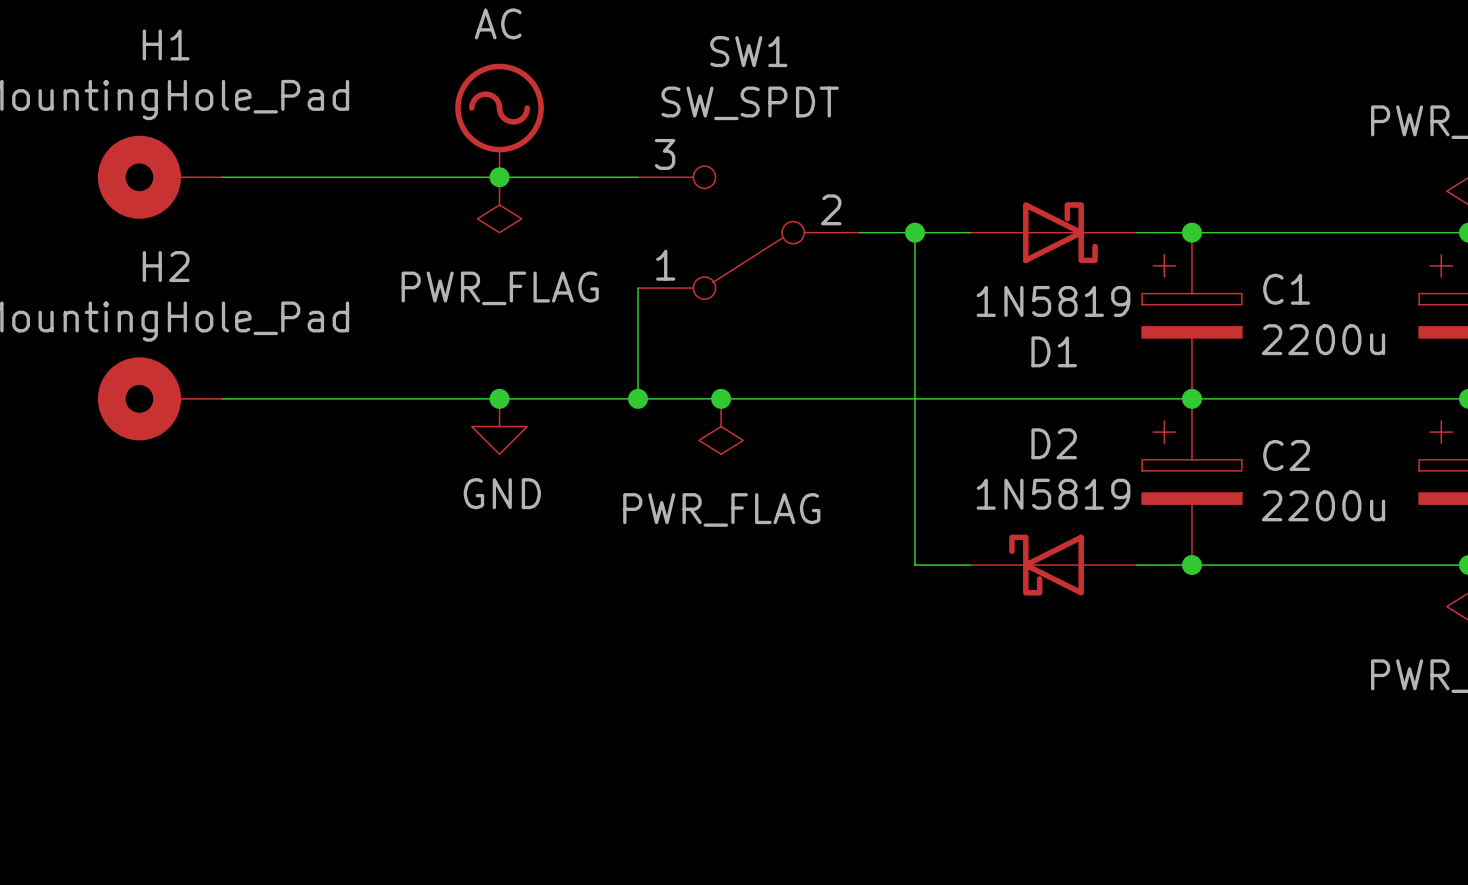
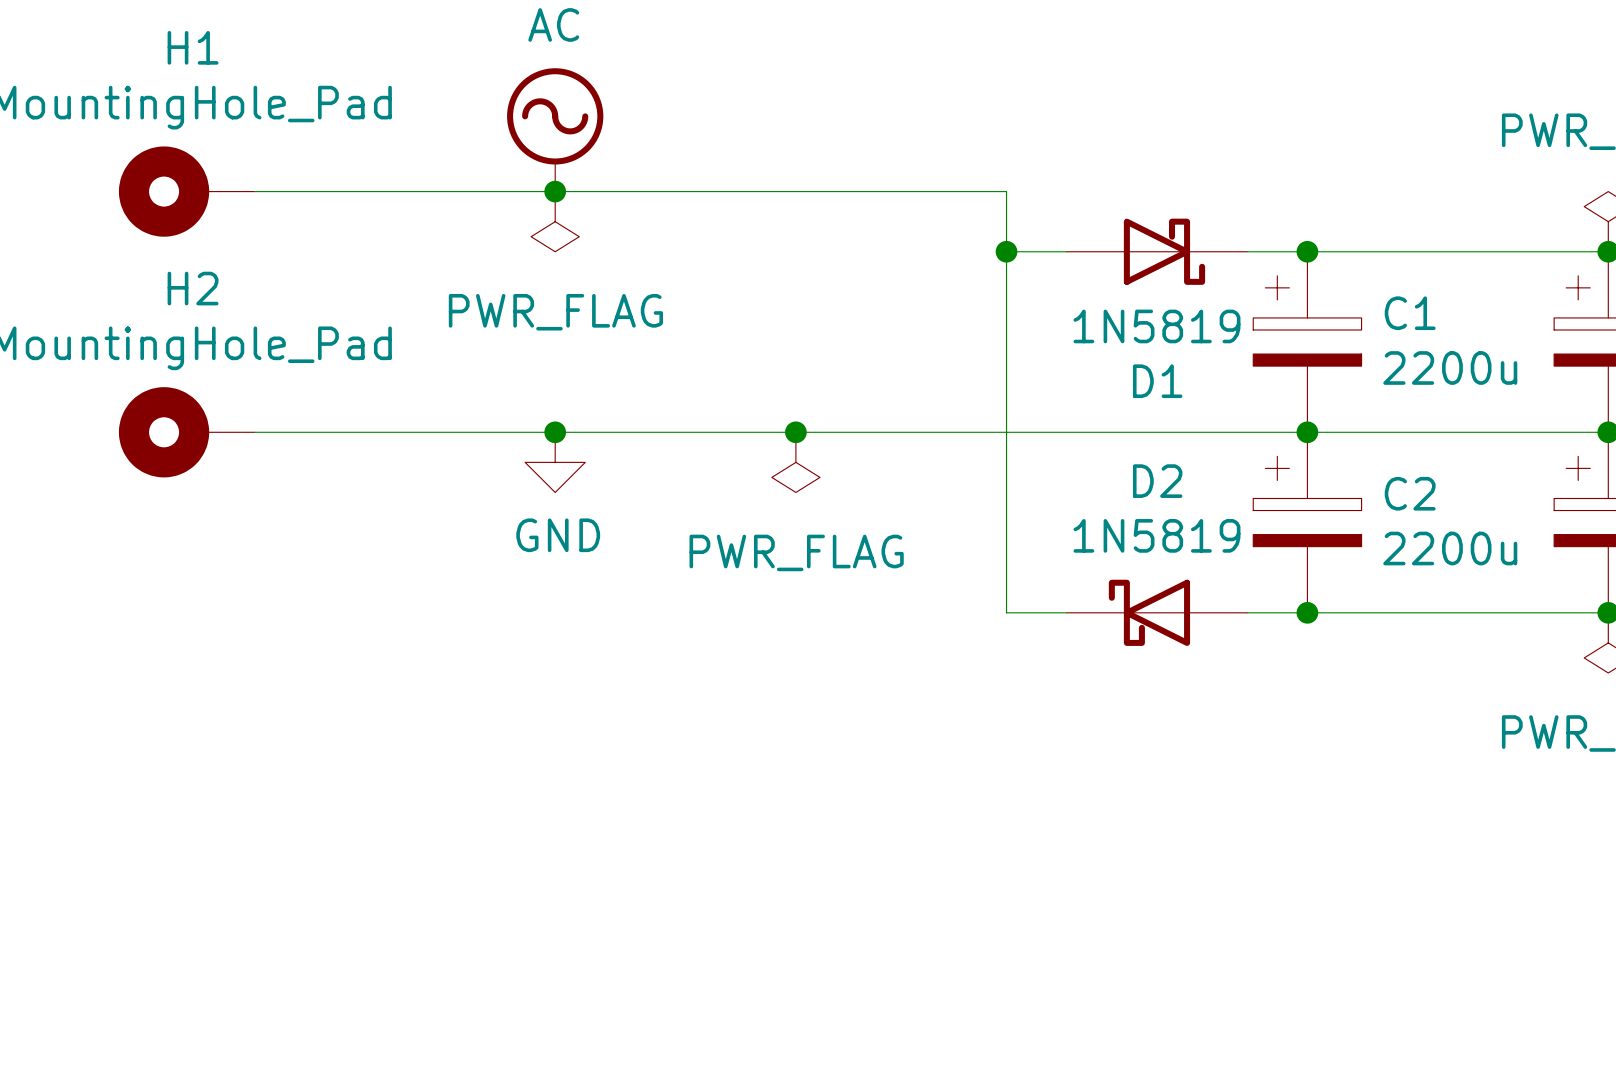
SW1: SW_SPDT (748, 232) -> none
wire: (859, 232) (915, 232) -> (705, 191) (1006, 191) (1006, 251)
wire: (638, 288) (638, 398) -> none
junction: (638, 398) -> none

